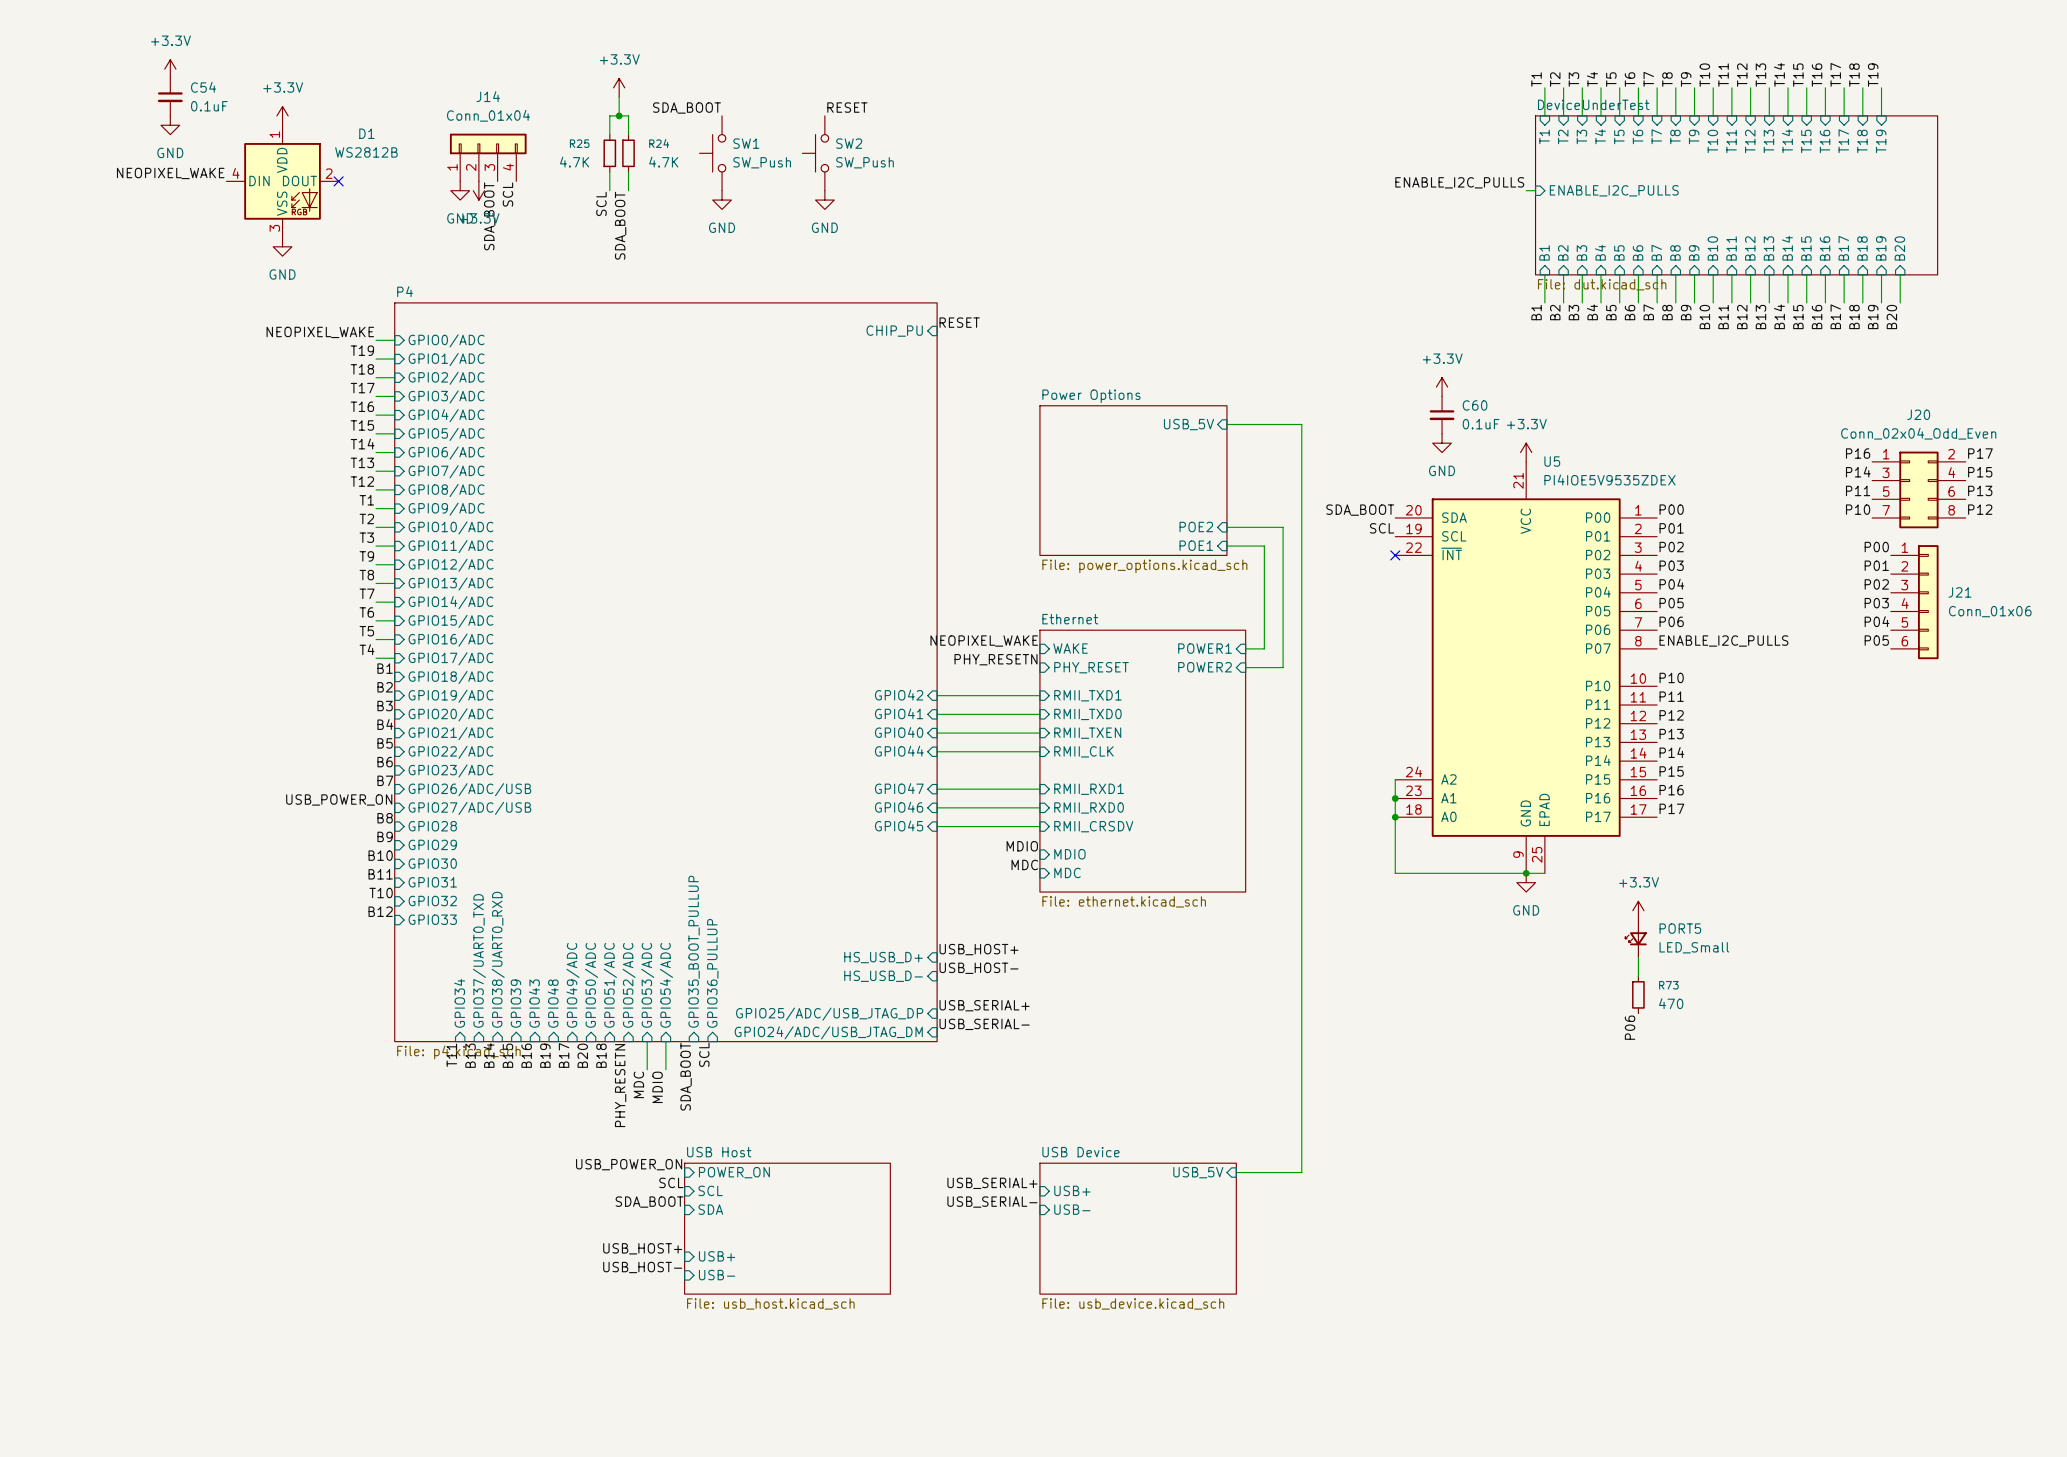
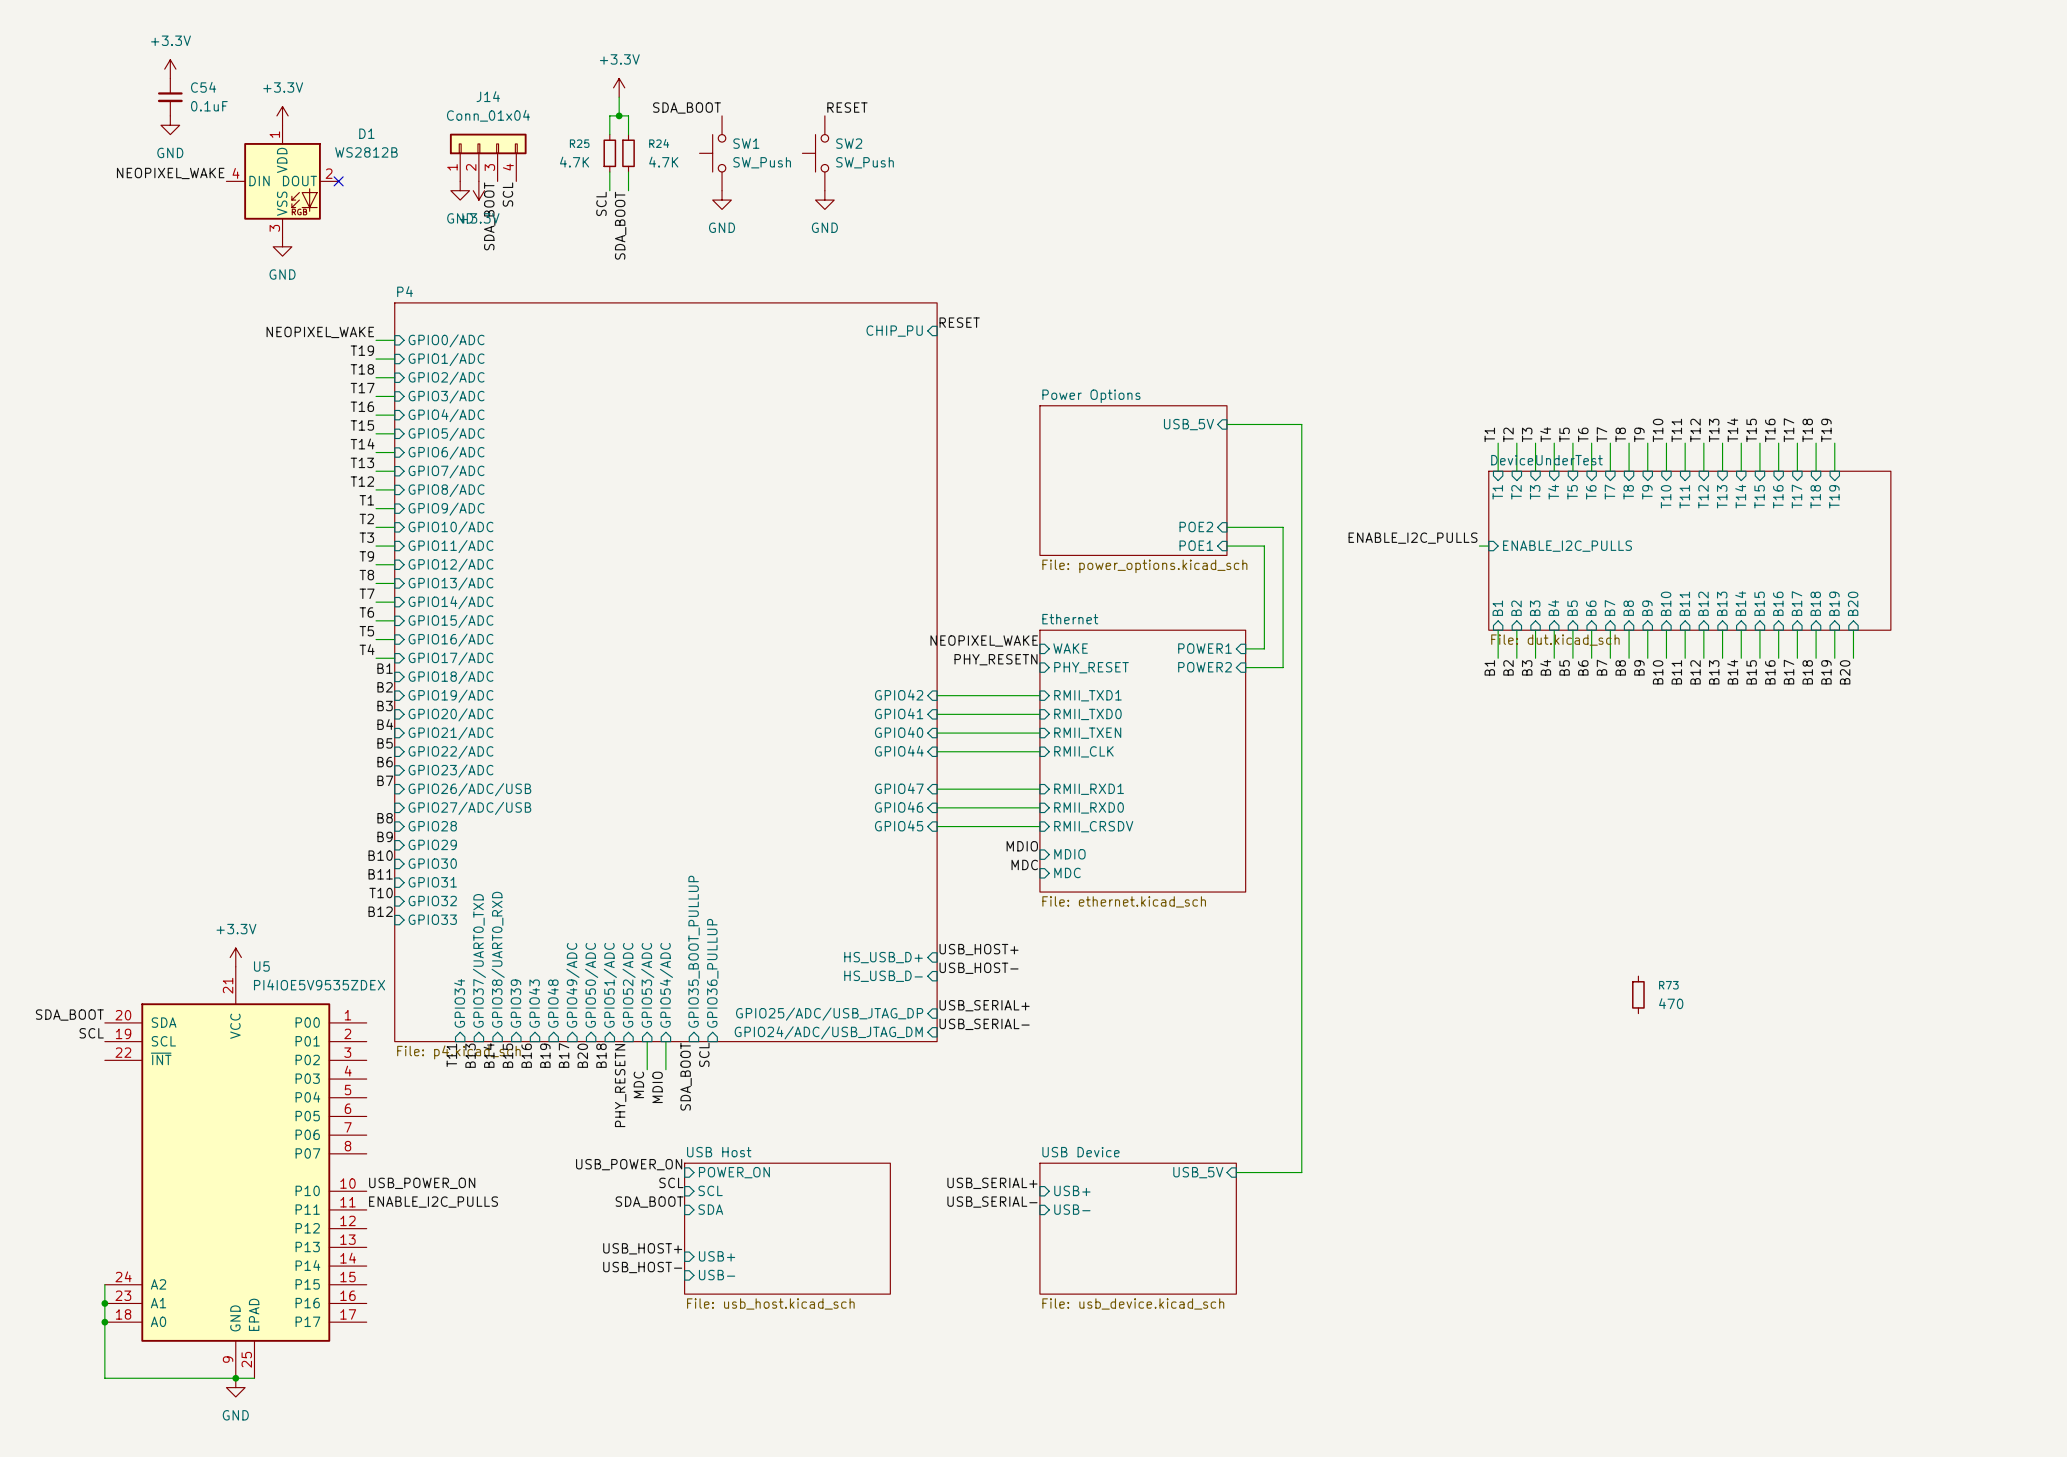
label: T14 (1779, 74) -> none
label: T17 (1835, 74) -> none
label: T10 (1704, 75) -> none
label: T11 (1723, 75) -> none
label: T12 (1742, 75) -> none
label: T13 (1760, 75) -> none
label: T15 (1798, 75) -> none
label: T16 (1817, 75) -> none
label: T18 (1854, 75) -> none
label: T19 (1873, 75) -> none
label: T1 (1536, 79) -> none
label: T2 (1555, 79) -> none
label: T3 (1573, 79) -> none
label: T4 (1592, 79) -> none
label: T5 (1611, 79) -> none
label: T6 (1630, 79) -> none
label: T7 (1648, 79) -> none
label: T8 (1667, 79) -> none
label: T9 (1686, 79) -> none
wire: (1544, 87) (1544, 115) -> none
wire: (1563, 87) (1563, 115) -> none
wire: (1582, 87) (1582, 115) -> none
wire: (1601, 87) (1601, 115) -> none
wire: (1619, 87) (1619, 115) -> none
wire: (1638, 87) (1638, 115) -> none
wire: (1657, 87) (1657, 115) -> none
wire: (1675, 87) (1675, 115) -> none
wire: (1694, 87) (1694, 115) -> none
wire: (1713, 87) (1713, 115) -> none
wire: (1731, 87) (1731, 115) -> none
wire: (1750, 87) (1750, 115) -> none
wire: (1769, 87) (1769, 115) -> none
wire: (1788, 87) (1788, 115) -> none
wire: (1806, 87) (1806, 115) -> none
wire: (1825, 87) (1825, 115) -> none
wire: (1844, 87) (1844, 115) -> none
wire: (1862, 87) (1862, 115) -> none
wire: (1881, 87) (1881, 115) -> none
sheet pin: T1 (1544, 136) -> none
sheet pin: T2 (1563, 136) -> none
sheet pin: T3 (1581, 136) -> none
sheet pin: T4 (1600, 136) -> none
sheet pin: T5 (1619, 136) -> none
sheet pin: T6 (1638, 136) -> none
sheet pin: T7 (1656, 136) -> none
sheet pin: T8 (1675, 136) -> none
sheet pin: T9 (1694, 136) -> none
sheet pin: T10 (1712, 141) -> none
sheet pin: T11 (1731, 141) -> none
sheet pin: T12 (1750, 141) -> none
sheet pin: T13 (1768, 141) -> none
sheet pin: T14 (1787, 141) -> none
sheet pin: T15 (1806, 141) -> none
sheet pin: T16 (1825, 141) -> none
sheet pin: T17 (1843, 141) -> none
sheet pin: T18 (1862, 141) -> none
sheet pin: T19 (1881, 141) -> none
label: ENABLE_I2C_PULLS (1459, 182) -> none
wire: (1526, 190) (1535, 190) -> none
sheet pin: ENABLE_I2C_PULLS (1614, 190) -> none
sheet DeviceUnderTest: File: dut.kicad_sch (1736, 195) -> none
sheet pin: B10 (1712, 248) -> none
sheet pin: B11 (1731, 248) -> none
sheet pin: B12 (1750, 248) -> none
sheet pin: B13 (1768, 248) -> none
sheet pin: B14 (1787, 248) -> none
sheet pin: B15 (1806, 248) -> none
sheet pin: B16 (1825, 248) -> none
sheet pin: B17 (1843, 248) -> none
sheet pin: B18 (1862, 248) -> none
sheet pin: B19 (1881, 248) -> none
sheet pin: B20 (1899, 248) -> none
sheet pin: B1 (1544, 252) -> none
sheet pin: B2 (1563, 252) -> none
sheet pin: B3 (1581, 252) -> none
sheet pin: B4 (1600, 252) -> none
sheet pin: B5 (1619, 252) -> none
sheet pin: B6 (1638, 252) -> none
sheet pin: B7 (1656, 252) -> none
sheet pin: B8 (1675, 252) -> none
sheet pin: B9 (1694, 252) -> none
wire: (1544, 274) (1544, 302) -> (1498, 443) (1498, 471)
wire: (1563, 274) (1563, 302) -> (1516, 443) (1516, 471)
wire: (1582, 274) (1582, 302) -> (1535, 443) (1535, 471)
wire: (1601, 274) (1601, 302) -> (1554, 443) (1554, 471)
wire: (1619, 274) (1619, 302) -> (1572, 443) (1572, 471)
wire: (1638, 274) (1638, 302) -> (1591, 443) (1591, 471)
wire: (1657, 274) (1657, 302) -> (1610, 443) (1610, 471)
wire: (1675, 274) (1675, 302) -> (1629, 443) (1629, 471)
wire: (1694, 274) (1694, 302) -> (1647, 443) (1647, 471)
wire: (1713, 274) (1713, 302) -> (1666, 443) (1666, 471)
wire: (1731, 274) (1731, 302) -> (1685, 443) (1685, 471)
wire: (1750, 274) (1750, 302) -> (1703, 443) (1703, 471)
wire: (1769, 274) (1769, 302) -> (1722, 443) (1722, 471)
wire: (1788, 274) (1788, 302) -> (1741, 443) (1741, 471)
wire: (1806, 274) (1806, 302) -> (1759, 443) (1759, 471)
wire: (1825, 274) (1825, 302) -> (1778, 443) (1778, 471)
wire: (1844, 274) (1844, 302) -> (1797, 443) (1797, 471)
wire: (1862, 274) (1862, 302) -> (1816, 443) (1816, 471)
wire: (1881, 274) (1881, 302) -> (1834, 443) (1834, 471)
wire: (1900, 274) (1900, 302) -> none
label: B1 (1536, 312) -> none
label: B2 (1555, 312) -> none
label: B3 (1573, 312) -> none
label: B4 (1592, 312) -> none
label: B5 (1611, 312) -> none
label: B6 (1630, 312) -> none
label: B7 (1648, 312) -> none
label: B8 (1667, 312) -> none
label: B9 (1686, 312) -> none
label: B14 (1779, 316) -> none
label: B17 (1835, 316) -> none
label: B10 (1704, 317) -> none
label: B11 (1723, 317) -> none
label: B12 (1742, 317) -> none
label: B13 (1760, 317) -> none
label: B15 (1798, 317) -> none
label: B16 (1817, 317) -> none
label: B18 (1854, 317) -> none
label: B19 (1873, 317) -> none
label: B20 (1891, 317) -> none
power symbol: +3.3V (1442, 387) -> none
C60: 0.1uF (1442, 415) -> none
label: none -> T10 (1658, 430)
label: none -> T11 (1676, 430)
label: none -> T12 (1695, 430)
label: none -> T13 (1714, 430)
label: none -> T14 (1732, 430)
label: none -> T15 (1751, 430)
label: none -> T16 (1770, 430)
label: none -> T17 (1789, 430)
label: none -> T18 (1807, 430)
label: none -> T19 (1826, 430)
label: none -> T1 (1489, 434)
label: none -> T2 (1508, 434)
label: none -> T3 (1527, 434)
label: none -> T4 (1545, 434)
label: none -> T5 (1564, 434)
label: none -> T6 (1583, 434)
label: none -> T7 (1602, 434)
label: none -> T8 (1620, 434)
label: none -> T9 (1639, 434)
power symbol: GND (1442, 443) -> none
power symbol: +3.3V (1526, 452) -> none
label: P16 (1858, 453) -> none
label: P17 (1980, 453) -> none
label: P14 (1858, 472) -> none
label: P15 (1980, 472) -> none
J20: Conn_02x04_Odd_Even (1918, 489) -> none
label: P11 (1858, 490) -> none
label: P13 (1980, 490) -> none
sheet pin: none -> T1 (1497, 492)
sheet pin: none -> T2 (1516, 492)
sheet pin: none -> T3 (1535, 492)
sheet pin: none -> T4 (1553, 492)
sheet pin: none -> T5 (1572, 492)
sheet pin: none -> T6 (1591, 492)
sheet pin: none -> T7 (1610, 492)
sheet pin: none -> T8 (1628, 492)
sheet pin: none -> T9 (1647, 492)
sheet pin: none -> T10 (1666, 496)
sheet pin: none -> T11 (1684, 496)
sheet pin: none -> T12 (1703, 496)
sheet pin: none -> T13 (1722, 496)
sheet pin: none -> T14 (1740, 496)
sheet pin: none -> T15 (1759, 496)
sheet pin: none -> T16 (1778, 496)
sheet pin: none -> T17 (1797, 496)
sheet pin: none -> T18 (1815, 496)
sheet pin: none -> T19 (1834, 496)
label: P00 (1671, 509) -> none
label: P10 (1858, 509) -> none
label: P12 (1980, 509) -> none
label: SDA_BOOT (1360, 510) -> none
label: SCL (1382, 528) -> none
label: P01 (1671, 528) -> none
label: none -> ENABLE_I2C_PULLS (1413, 538)
sheet pin: none -> ENABLE_I2C_PULLS (1567, 546)
label: P02 (1671, 547) -> none
label: P00 (1876, 547) -> none
sheet DeviceUnderTest: none -> File: dut.kicad_sch (1689, 550)
no-connect mark: (1395, 555) -> none
label: P03 (1671, 565) -> none
label: P01 (1876, 565) -> none
label: P04 (1671, 584) -> none
label: P02 (1876, 584) -> none
J21: Conn_01x06 (1914, 602) -> none
sheet pin: none -> B10 (1666, 603)
label: P05 (1671, 603) -> none
sheet pin: none -> B11 (1684, 603)
sheet pin: none -> B12 (1703, 603)
sheet pin: none -> B13 (1722, 603)
sheet pin: none -> B14 (1740, 603)
sheet pin: none -> B15 (1759, 603)
sheet pin: none -> B16 (1778, 603)
sheet pin: none -> B17 (1797, 603)
sheet pin: none -> B18 (1815, 603)
sheet pin: none -> B19 (1834, 603)
sheet pin: none -> B20 (1853, 603)
label: P03 (1876, 603) -> none
sheet pin: none -> B1 (1497, 608)
sheet pin: none -> B2 (1516, 608)
sheet pin: none -> B3 (1535, 608)
sheet pin: none -> B4 (1553, 608)
sheet pin: none -> B5 (1572, 608)
sheet pin: none -> B6 (1591, 608)
sheet pin: none -> B7 (1610, 608)
sheet pin: none -> B8 (1628, 608)
sheet pin: none -> B9 (1647, 608)
label: P06 (1671, 621) -> none
label: P04 (1877, 621) -> none
wire: none -> (1629, 630) (1629, 658)
wire: none -> (1647, 630) (1647, 658)
wire: none -> (1666, 630) (1666, 658)
wire: none -> (1685, 630) (1685, 658)
wire: none -> (1703, 630) (1703, 658)
wire: none -> (1722, 630) (1722, 658)
wire: none -> (1741, 630) (1741, 658)
wire: none -> (1759, 630) (1759, 658)
wire: none -> (1778, 630) (1778, 658)
wire: none -> (1797, 630) (1797, 658)
wire: none -> (1816, 630) (1816, 658)
wire: none -> (1834, 630) (1834, 658)
wire: none -> (1853, 630) (1853, 658)
label: P05 (1876, 640) -> none
label: ENABLE_I2C_PULLS (1723, 641) -> none
label: none -> B1 (1489, 667)
label: none -> B2 (1508, 667)
U5 position: (1526, 667) -> (235, 1172)
label: none -> B3 (1527, 667)
label: none -> B4 (1545, 667)
label: none -> B5 (1564, 667)
label: none -> B6 (1583, 667)
label: none -> B7 (1602, 667)
label: none -> B8 (1620, 667)
label: none -> B9 (1639, 667)
label: none -> B12 (1695, 672)
label: none -> B13 (1714, 672)
label: none -> B14 (1732, 672)
label: none -> B15 (1751, 672)
label: none -> B16 (1770, 672)
label: none -> B17 (1789, 672)
label: none -> B18 (1807, 672)
label: none -> B19 (1826, 672)
label: none -> B20 (1845, 672)
label: P10 (1671, 677) -> B10 (1658, 672)
label: P11 (1671, 696) -> B11 (1676, 672)
label: P12 (1671, 715) -> none
label: P13 (1671, 734) -> none
label: P14 (1671, 752) -> none
label: P15 (1671, 771) -> none
wire: (1395, 779) (1395, 873) (1544, 873) -> none
label: P16 (1671, 790) -> none
junction: (1395, 798) -> none
label: USB_POWER_ON (339, 799) -> none
label: P17 (1671, 808) -> none
junction: (1395, 817) -> none
junction: (1526, 873) -> none
power symbol: GND (1526, 882) -> none
power symbol: +3.3V (1638, 910) -> none
PORT5: LED_Small (1636, 938) -> none
power symbol: none -> +3.3V (235, 957)
wire: (1638, 957) (1638, 976) -> none
label: none -> SDA_BOOT (69, 1015)
label: P06 (1630, 1027) -> none
label: none -> SCL (91, 1033)
label: none -> USB_POWER_ON (422, 1183)
label: none -> ENABLE_I2C_PULLS (433, 1202)
wire: none -> (104, 1284) (104, 1378) (254, 1378)
junction: none -> (104, 1303)
junction: none -> (104, 1322)
junction: none -> (235, 1378)
power symbol: none -> GND (235, 1387)

